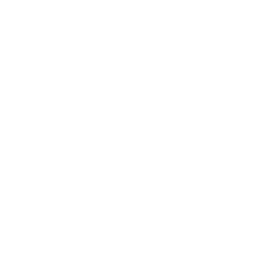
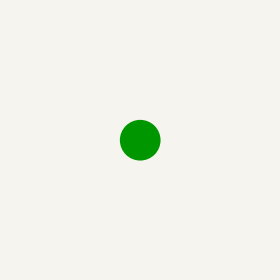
junction: none -> (140, 140)

